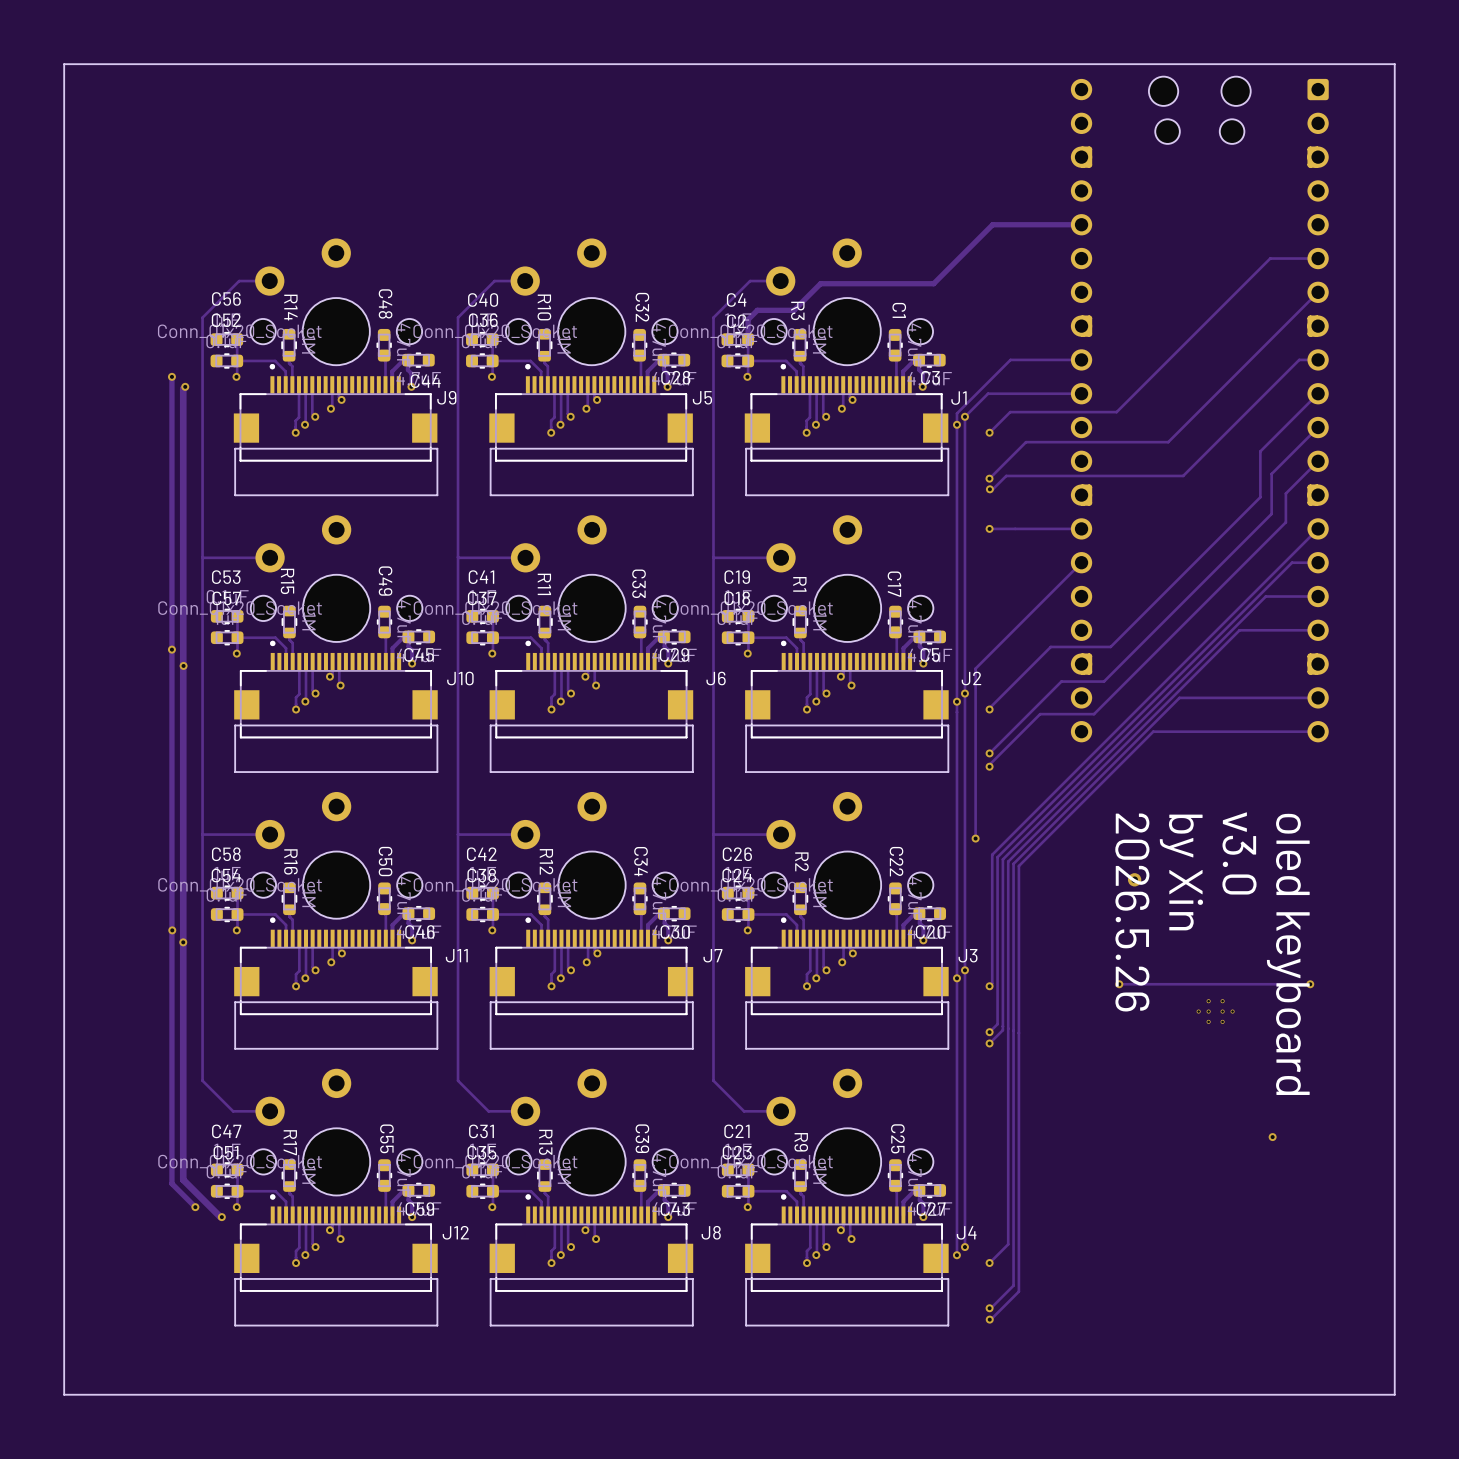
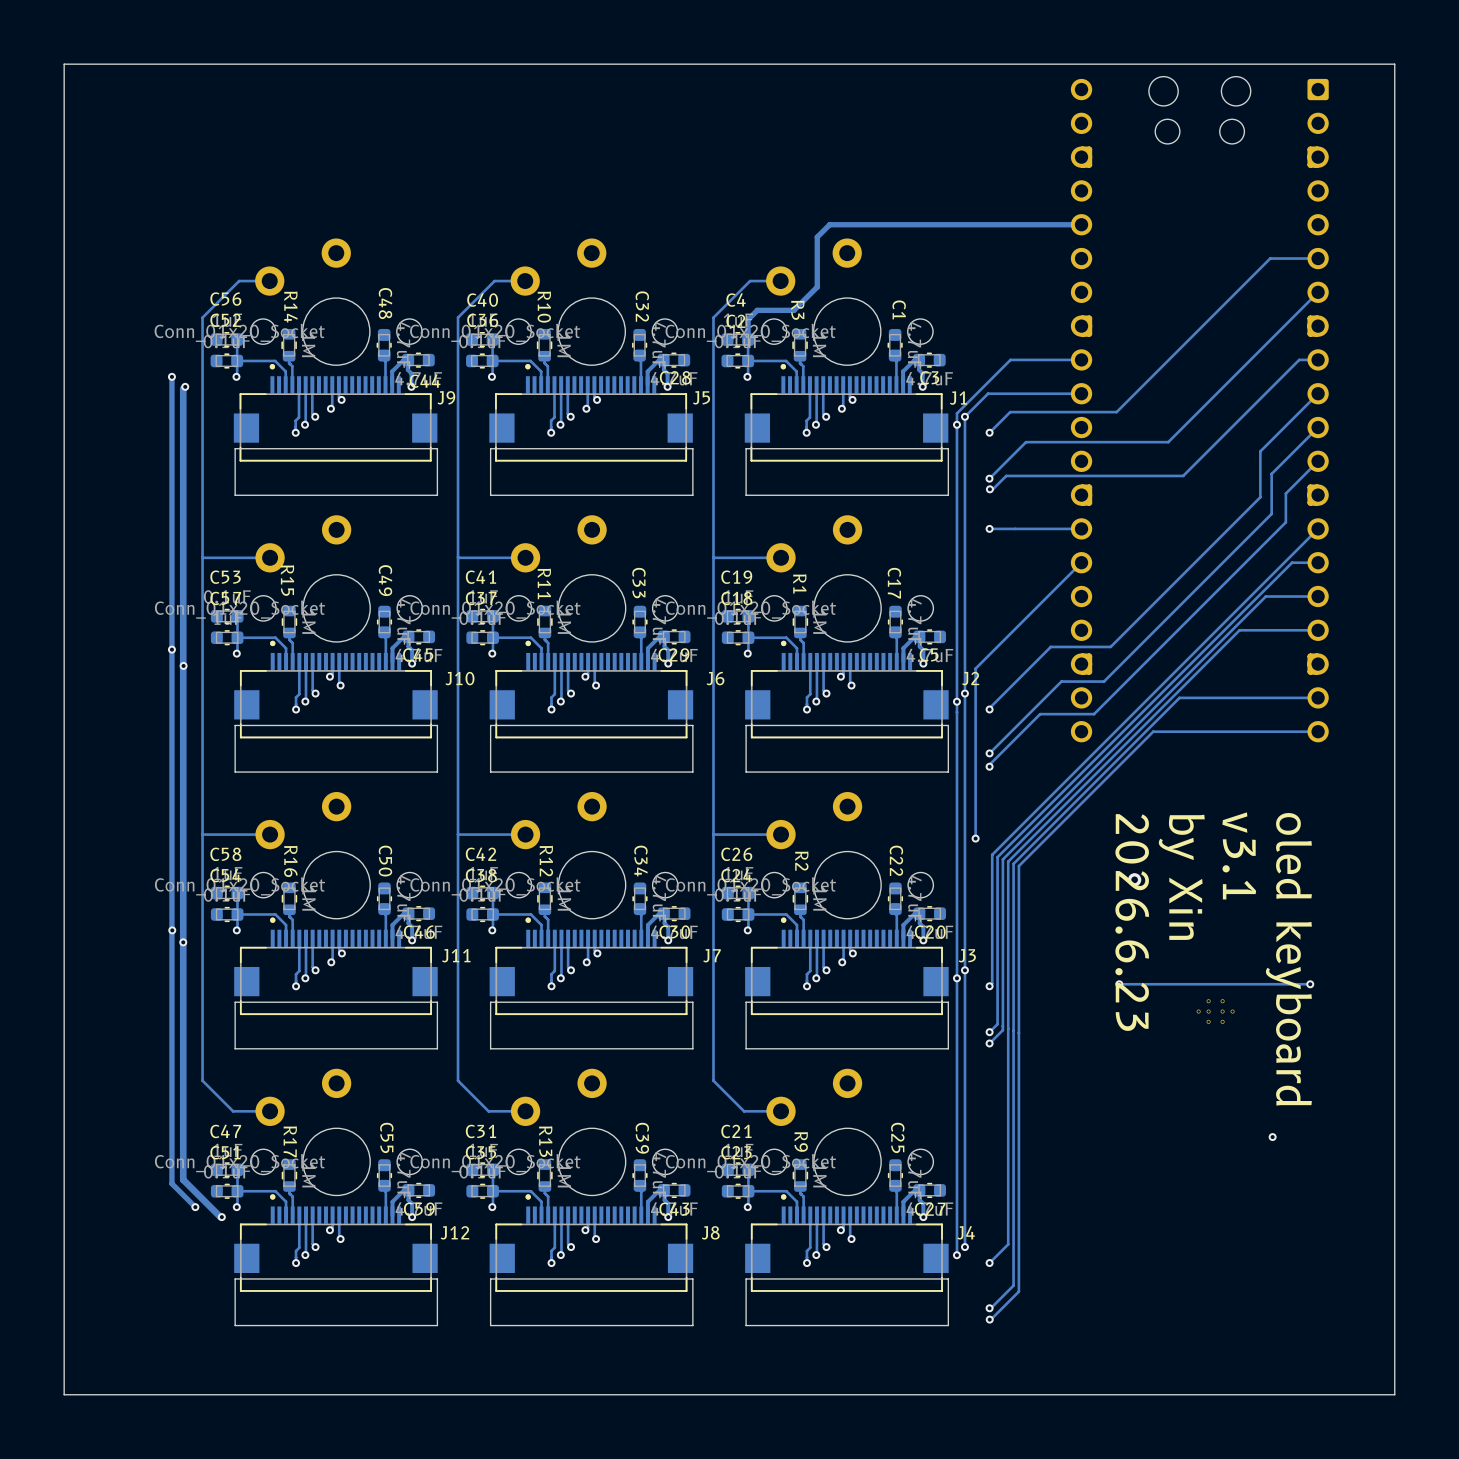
track: (992, 224) (933, 283) (820, 283) (817, 287) -> (992, 224) (829, 224) (817, 237) (817, 287)
text: v3.0 (1239, 853) -> v3.1 (1239, 855)
text: 2026.5.26 (1132, 912) -> 2026.6.23 (1132, 922)

